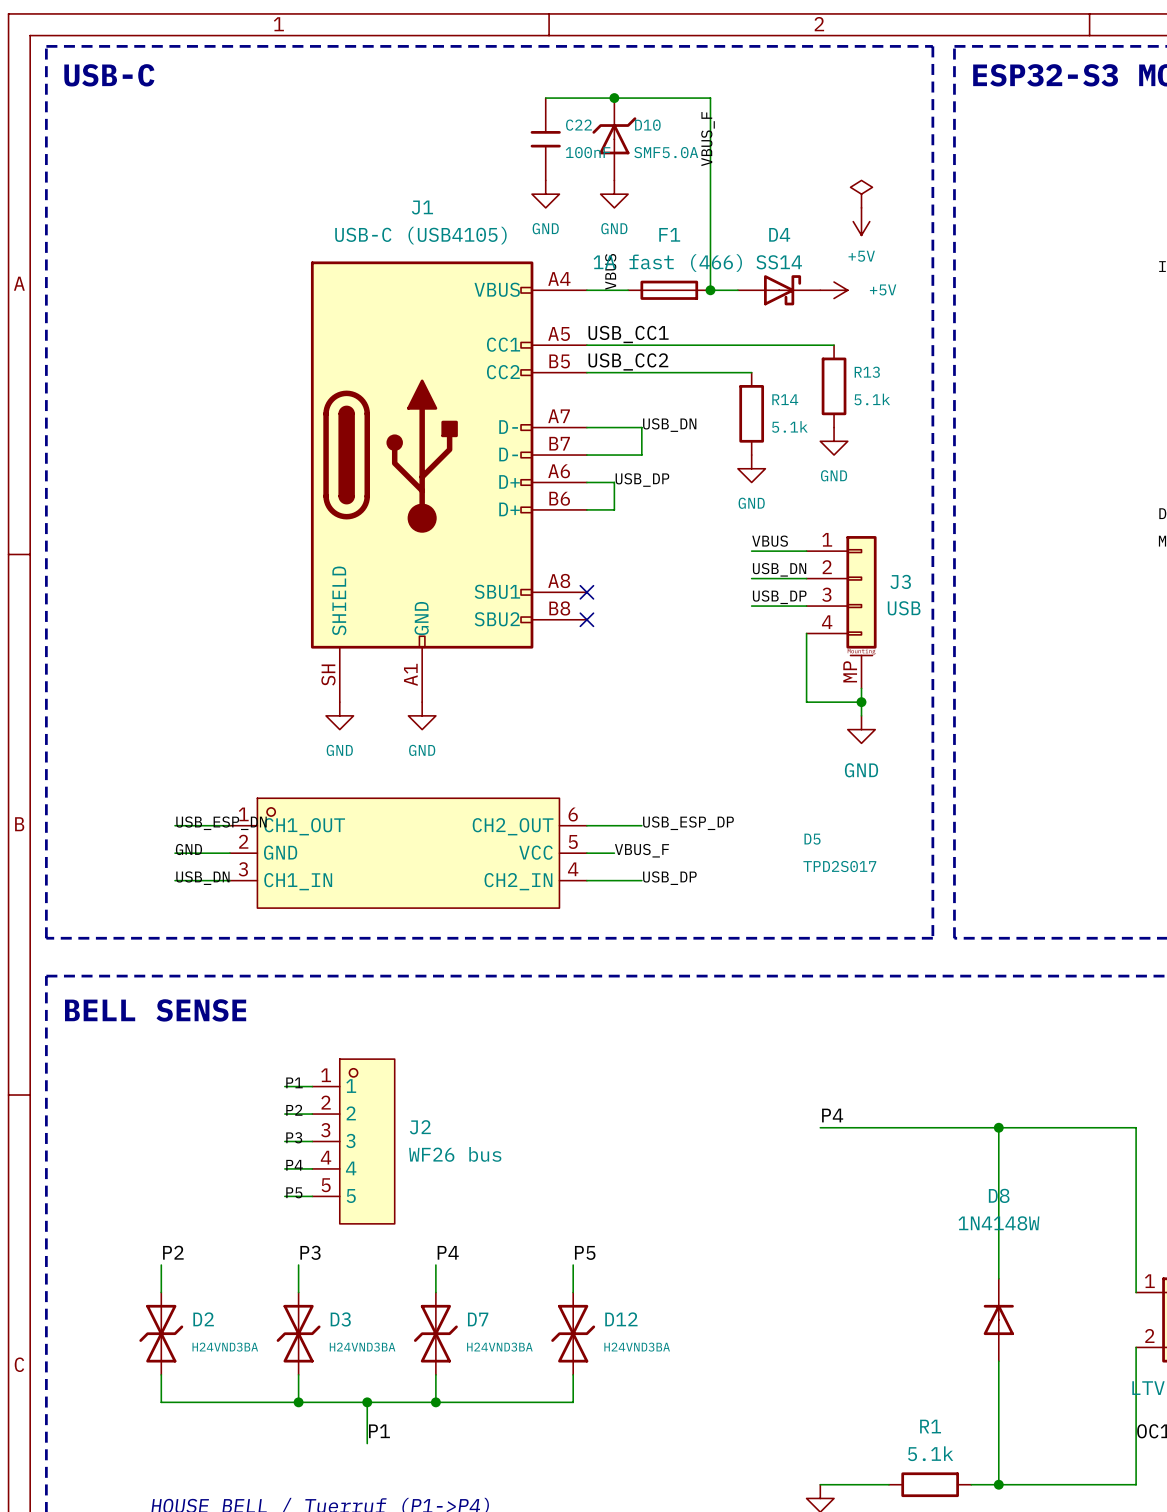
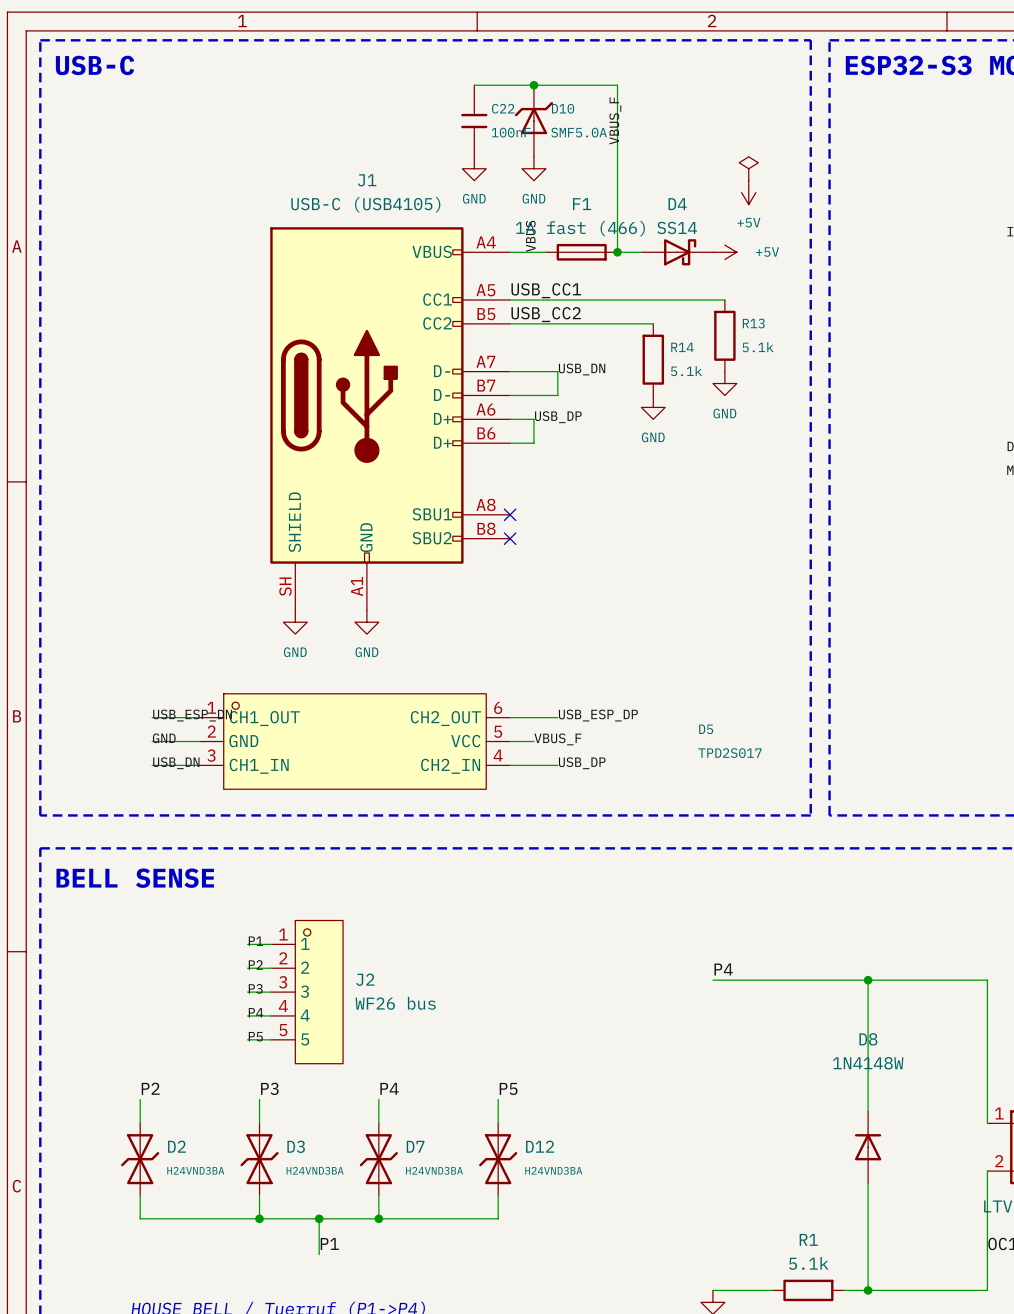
label: VBUS (770, 541) -> none
wire: (751, 551) (806, 551) -> none
label: USB_DN (779, 569) -> none
wire: (751, 578) (806, 578) -> none
label: USB_DP (779, 597) -> none
wire: (751, 606) (806, 606) -> none
J3: USB (841, 612) -> none
wire: (806, 633) (806, 702) (861, 702) -> none
wire: (861, 688) (861, 715) -> none
junction: (861, 702) -> none
power symbol: GND (861, 729) -> none

